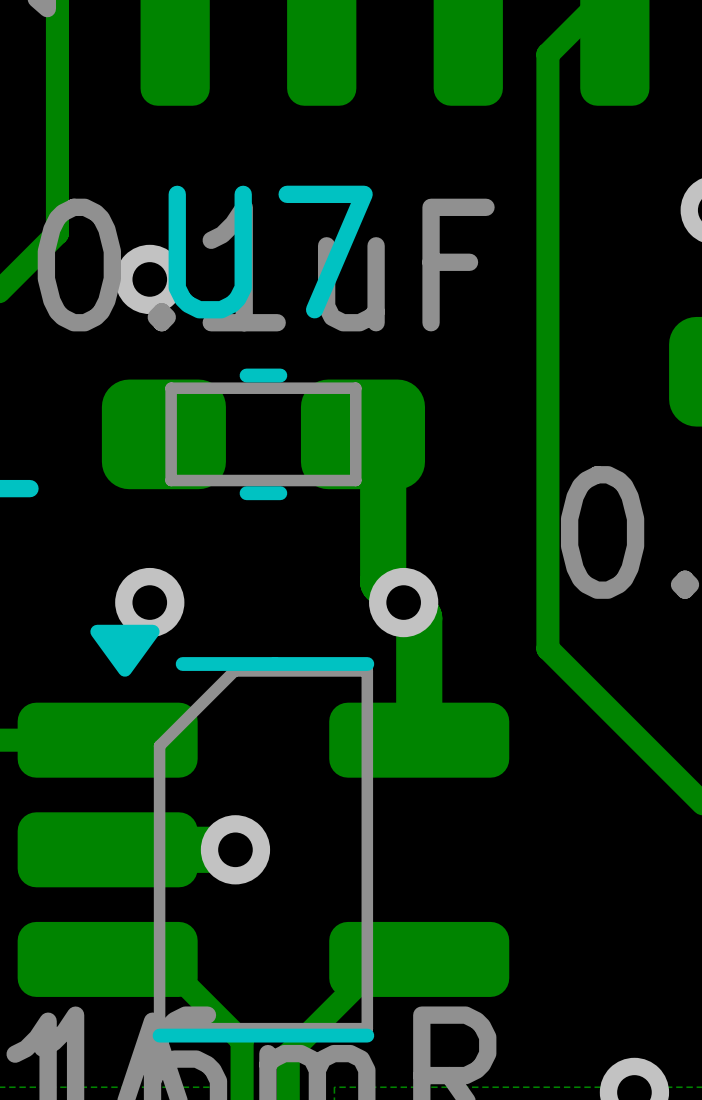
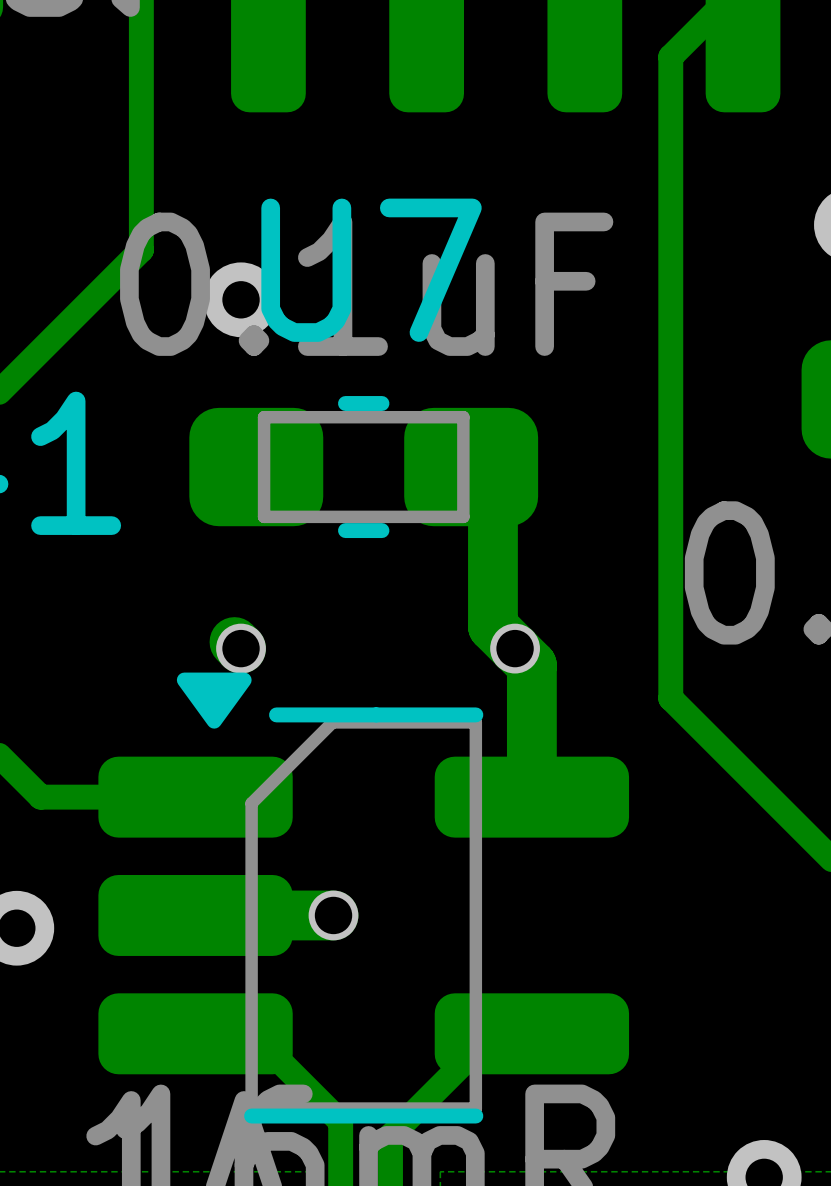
via size: [115, 567, 185, 638] -> [216, 623, 266, 674]
via size: [369, 567, 439, 638] -> [490, 623, 540, 674]
via size: [200, 815, 271, 885] -> [308, 890, 359, 941]

